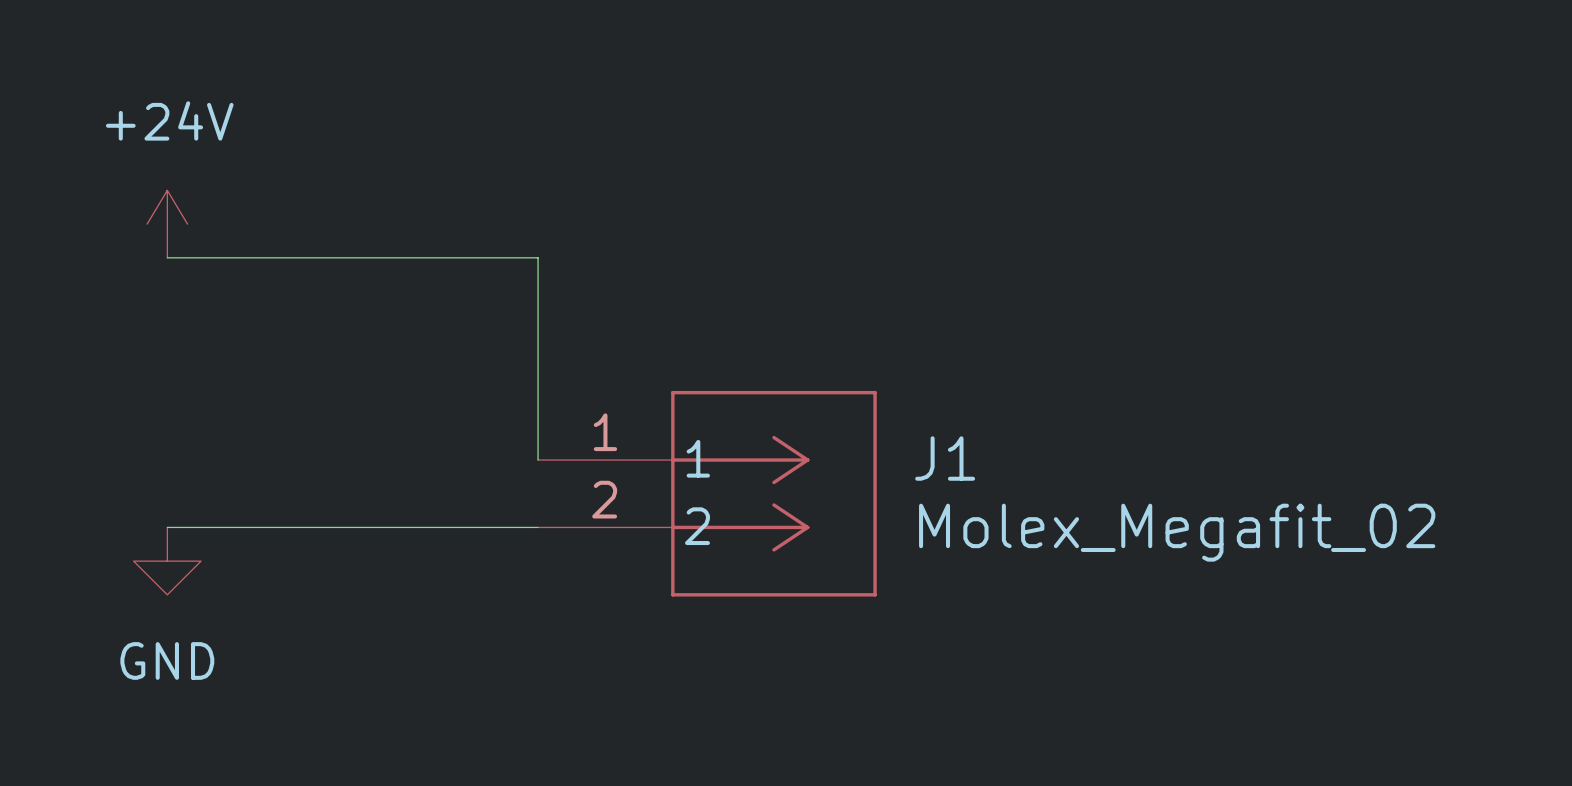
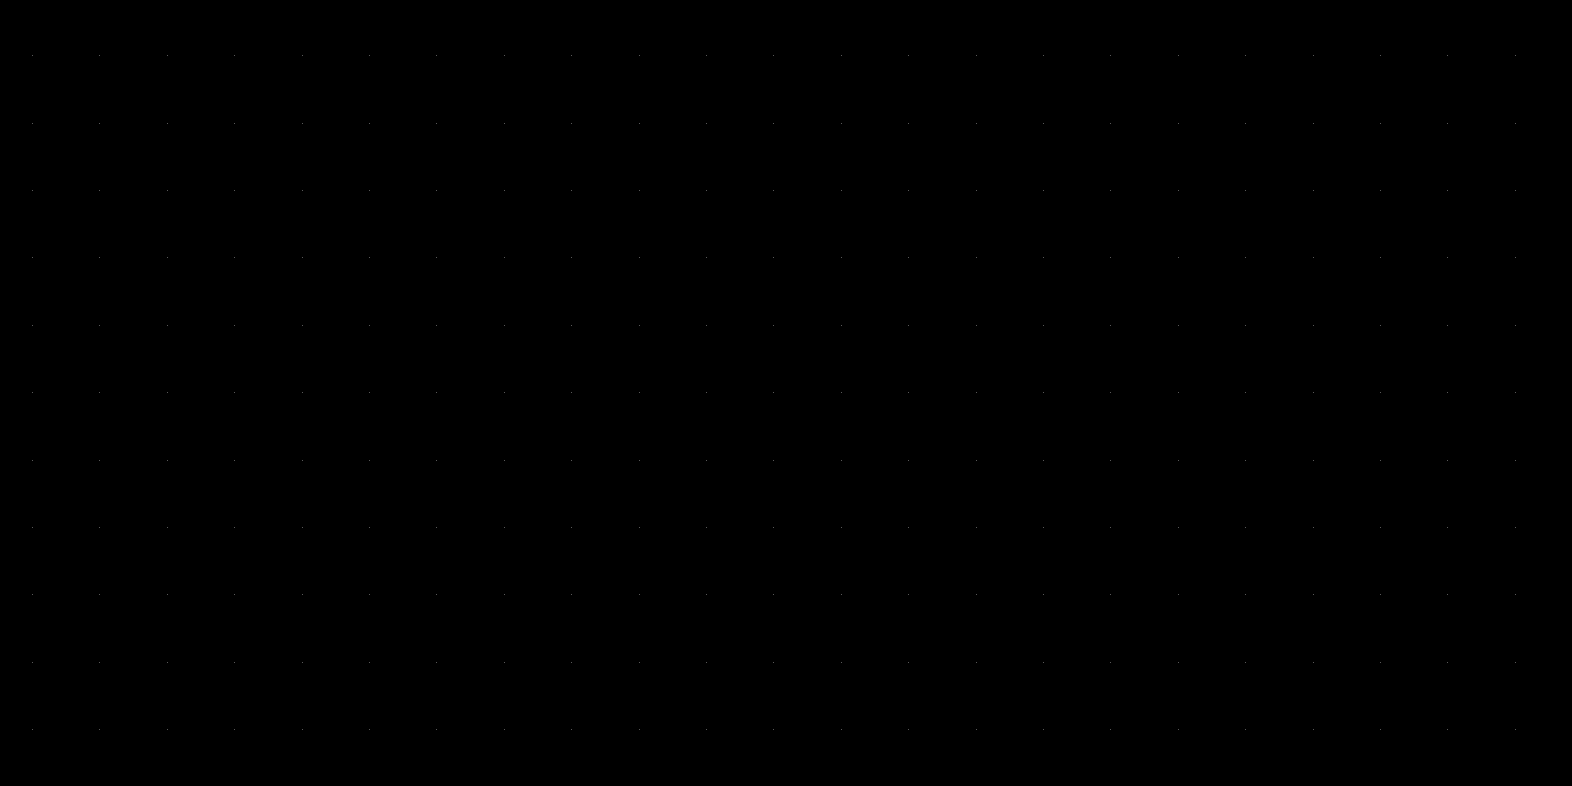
power symbol: +24V (167, 224) -> none
wire: (167, 257) (538, 257) (538, 460) -> none
J1: Molex_Megafit_02 (707, 493) -> none
wire: (167, 527) (538, 527) -> none
power symbol: GND (167, 561) -> none

